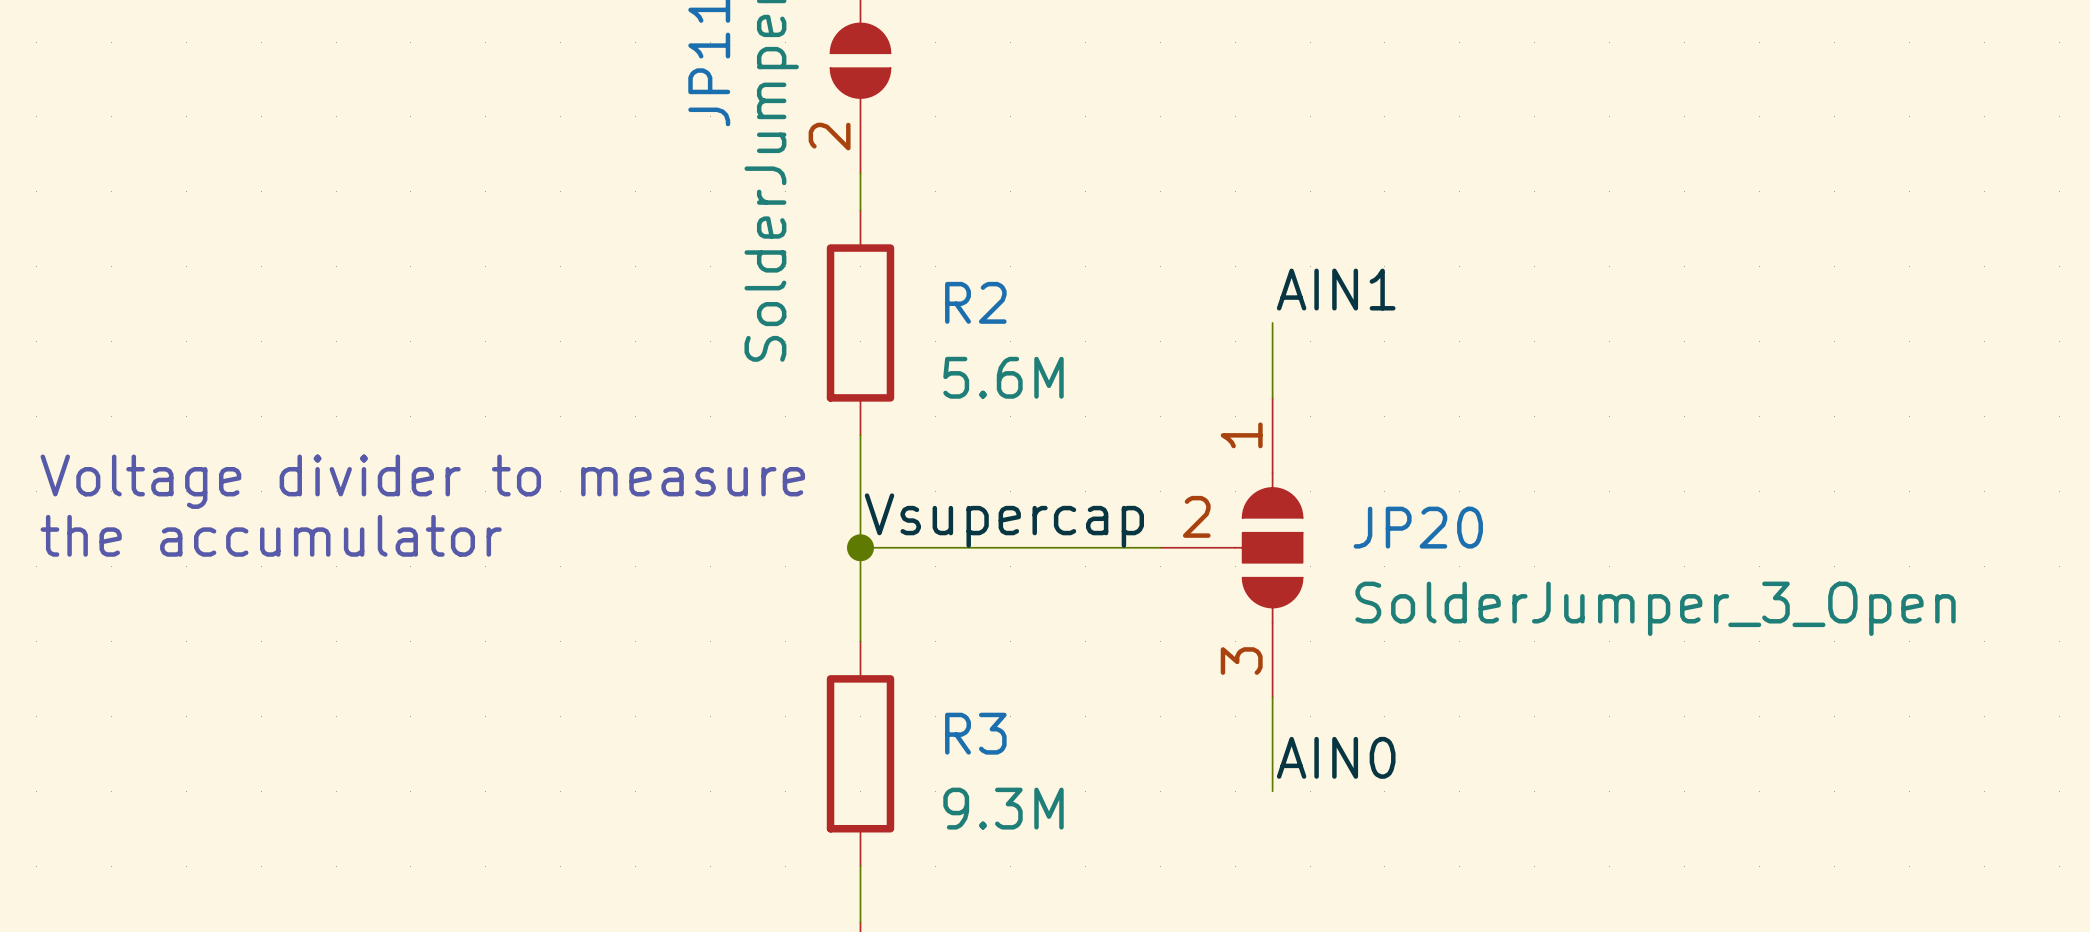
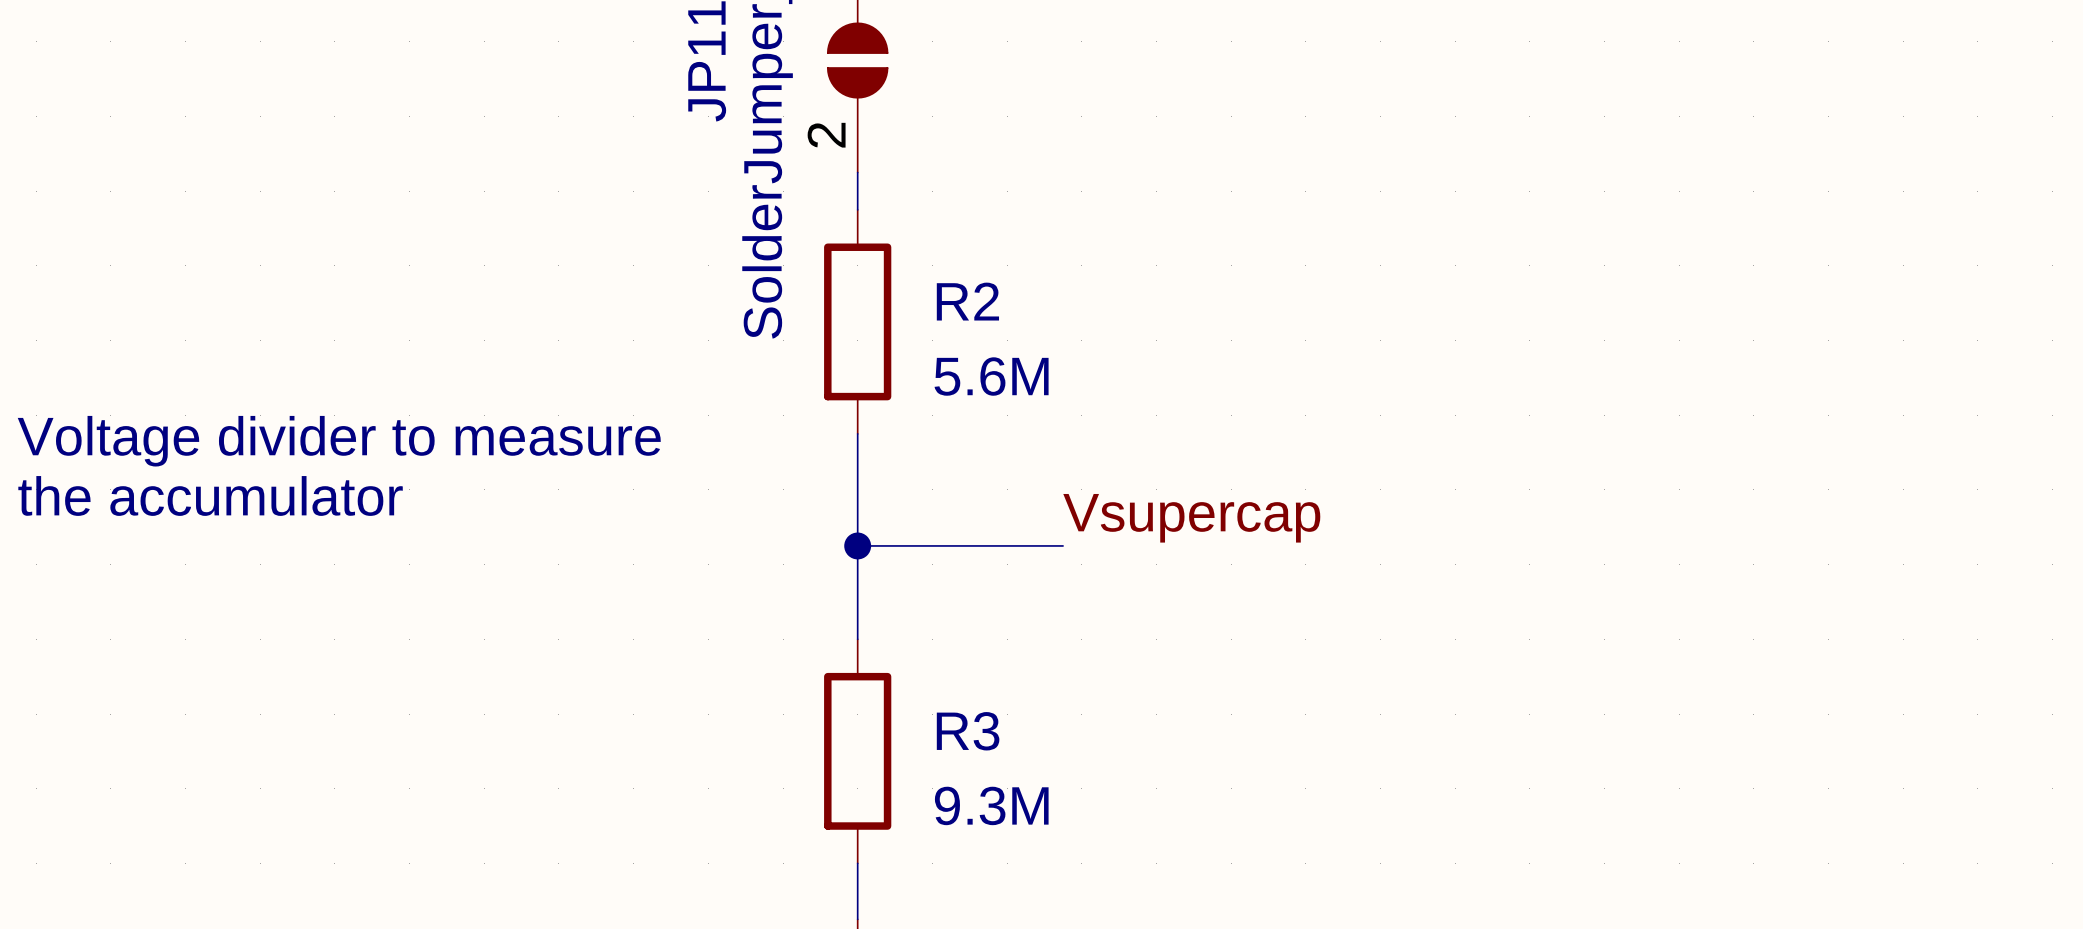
label: AIN1 (1336, 289) -> none
wire: (1272, 322) (1272, 397) -> none
text position: Voltage divider to measure (422, 481) -> Voltage divider to measure (339, 441)
label position: Vsupercap (1004, 520) -> Vsupercap (1191, 518)
text position: the accumulator (271, 535) -> the accumulator (210, 495)
wire: (1066, 547) (1160, 547) -> none
JP20: SolderJumper_3_Open (1231, 547) -> none
wire: (1272, 697) (1272, 791) -> none
label: AIN0 (1336, 757) -> none

